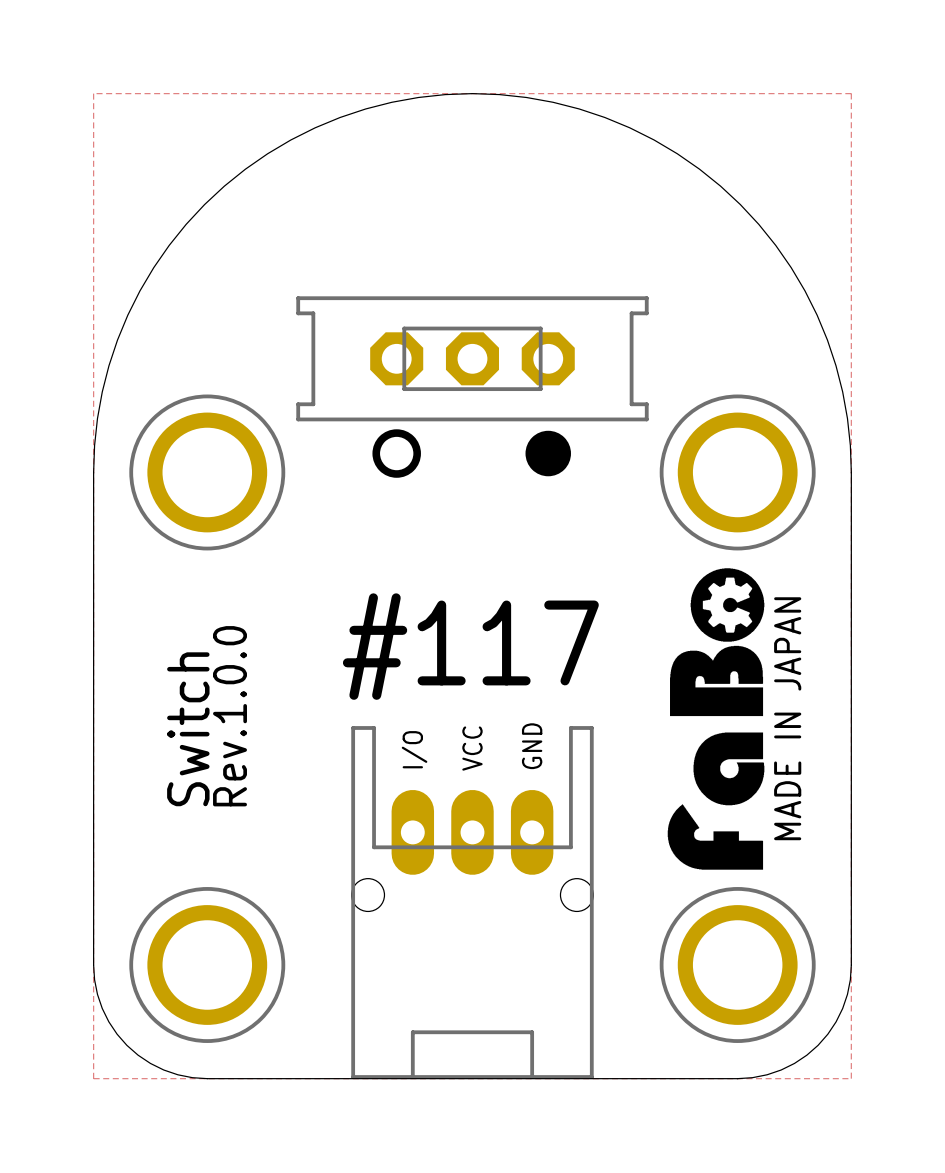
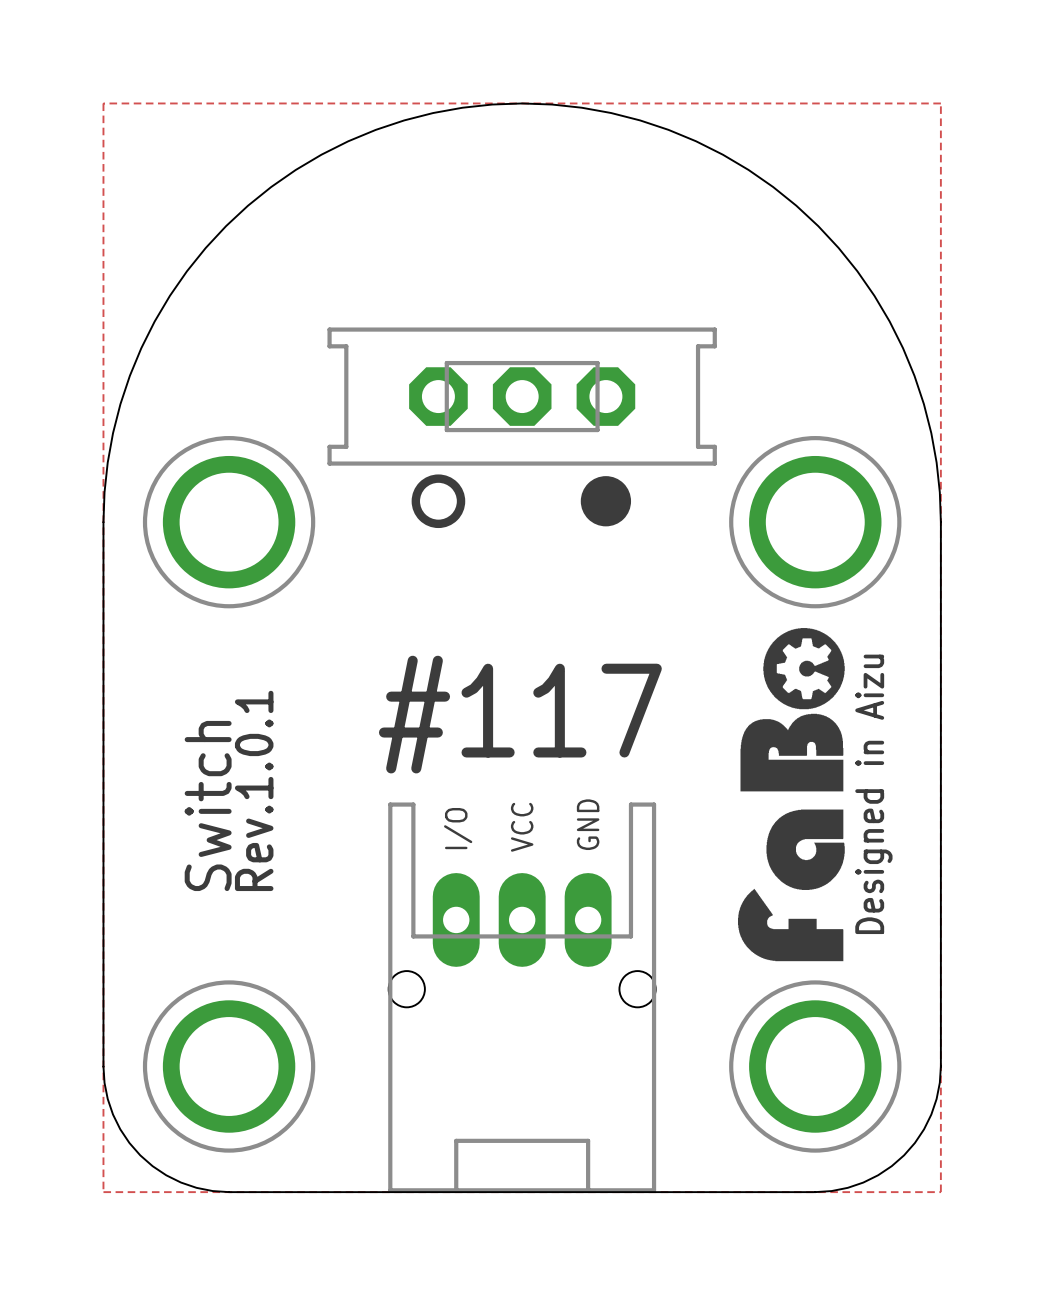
text: Rev.1.0.0 (230, 716) -> Rev.1.0.1 (254, 790)
text: MADE IN JAPAN (787, 718) -> Designed in Aizu (873, 794)

